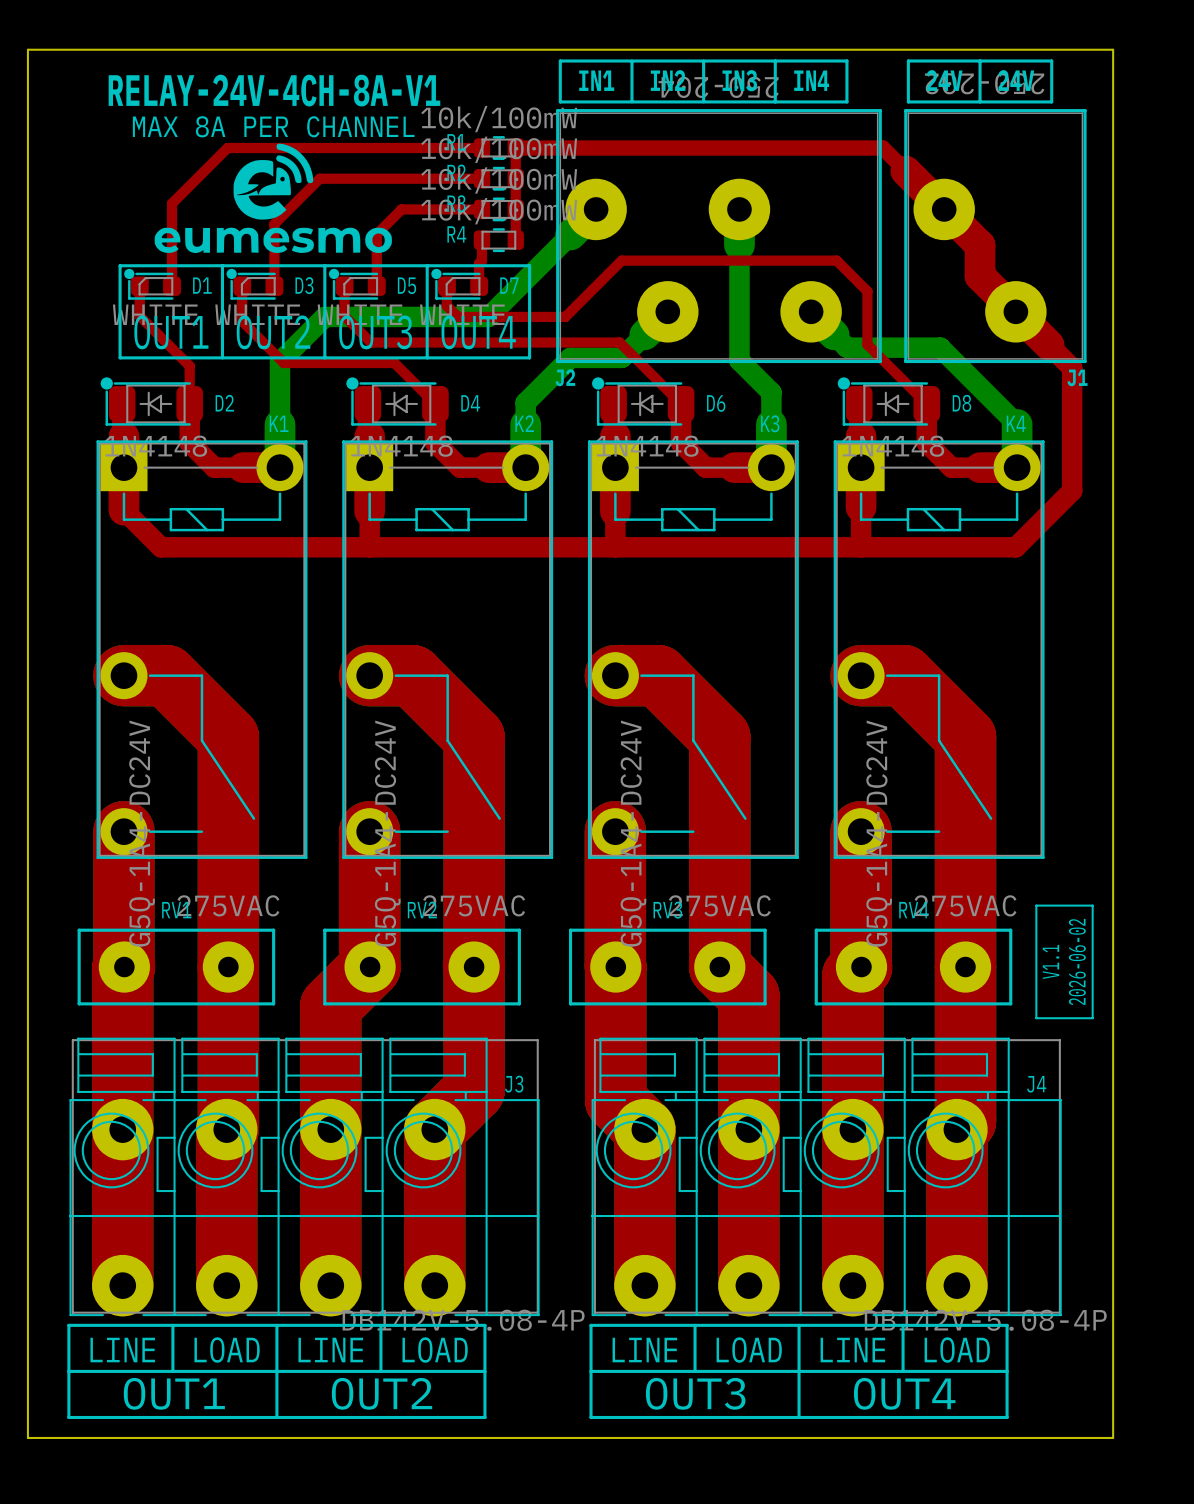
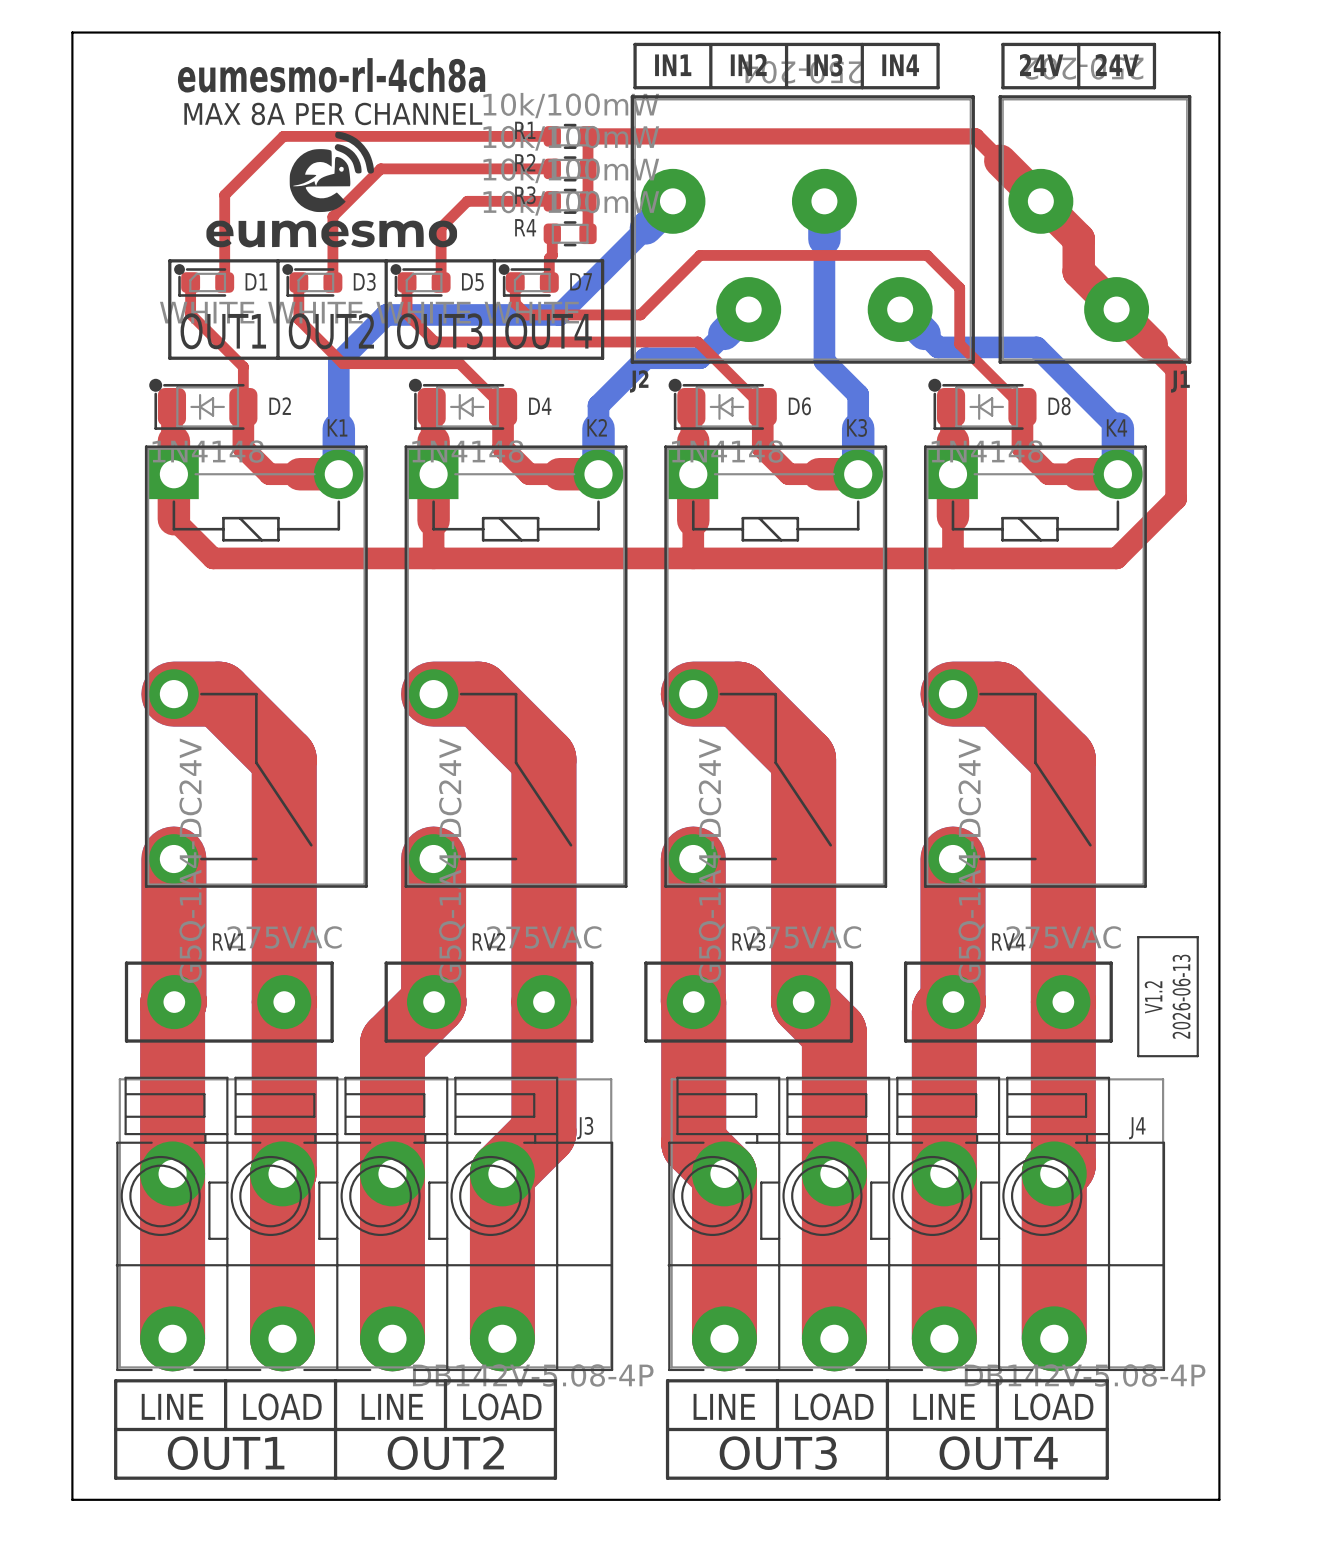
text: RELAY-24V-4CH-8A-V1 (274, 90) -> eumesmo-rl-4ch8a (331, 75)
text: V1.1 (1051, 961) -> V1.2 (1153, 997)
text: 2026-06-02 (1077, 961) -> 2026-06-13 (1181, 996)

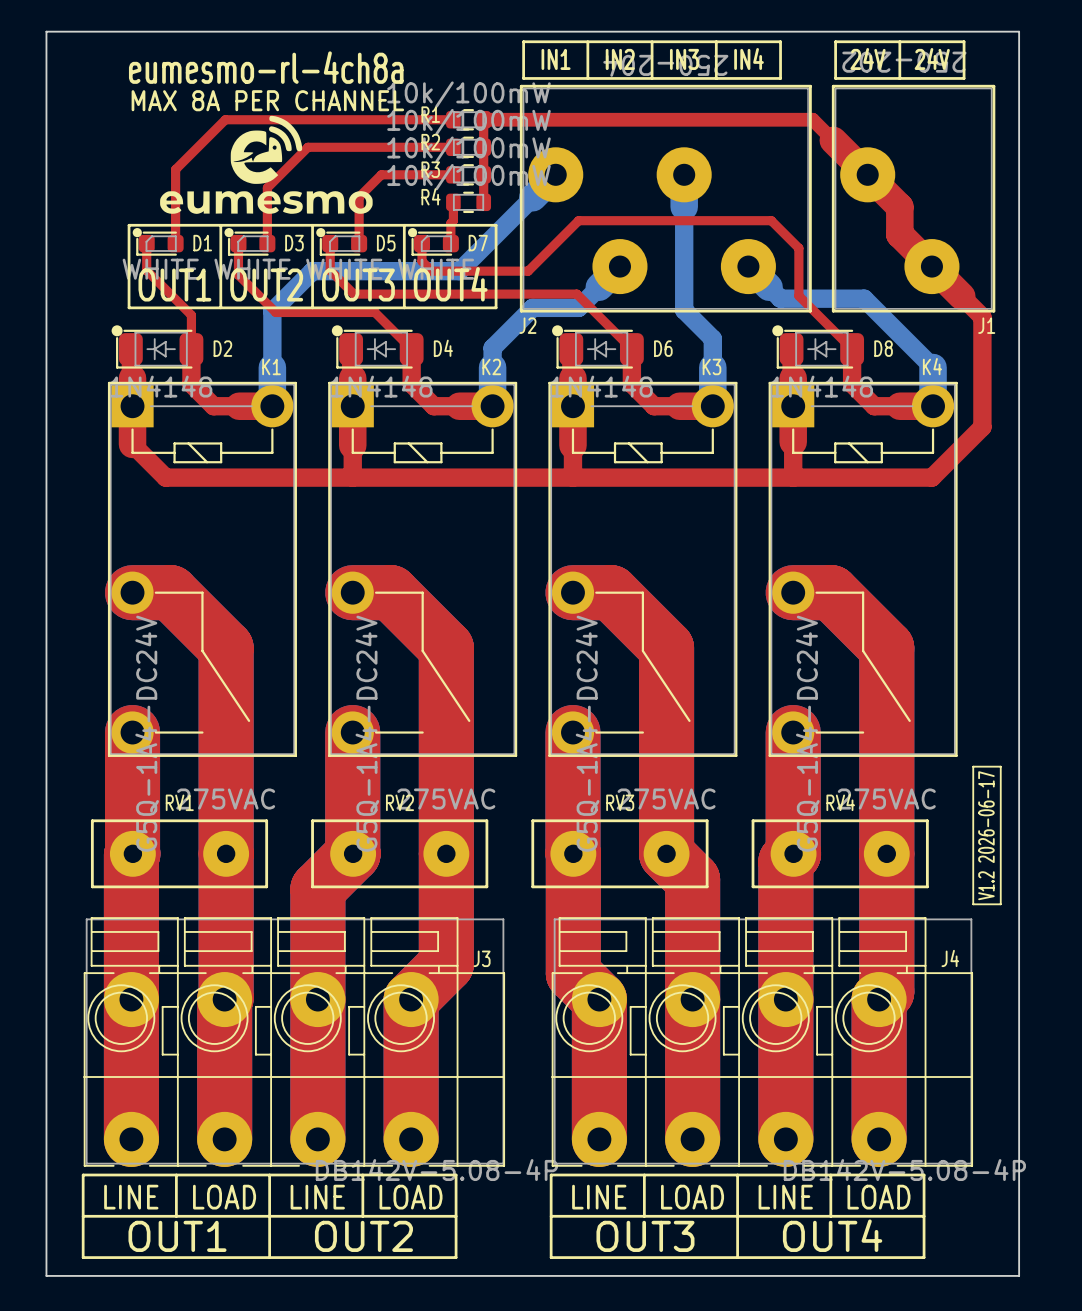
line: (1197, 937) (1138, 937) (1138, 1056) (1197, 1056) -> (1000, 798) (1000, 766) (973, 766) (973, 904) (1000, 904) (1000, 899)
text: 2026-06-13 (1181, 996) -> V1.2 2026-06-17 (986, 835)
text: V1.2 (1153, 997) -> none

